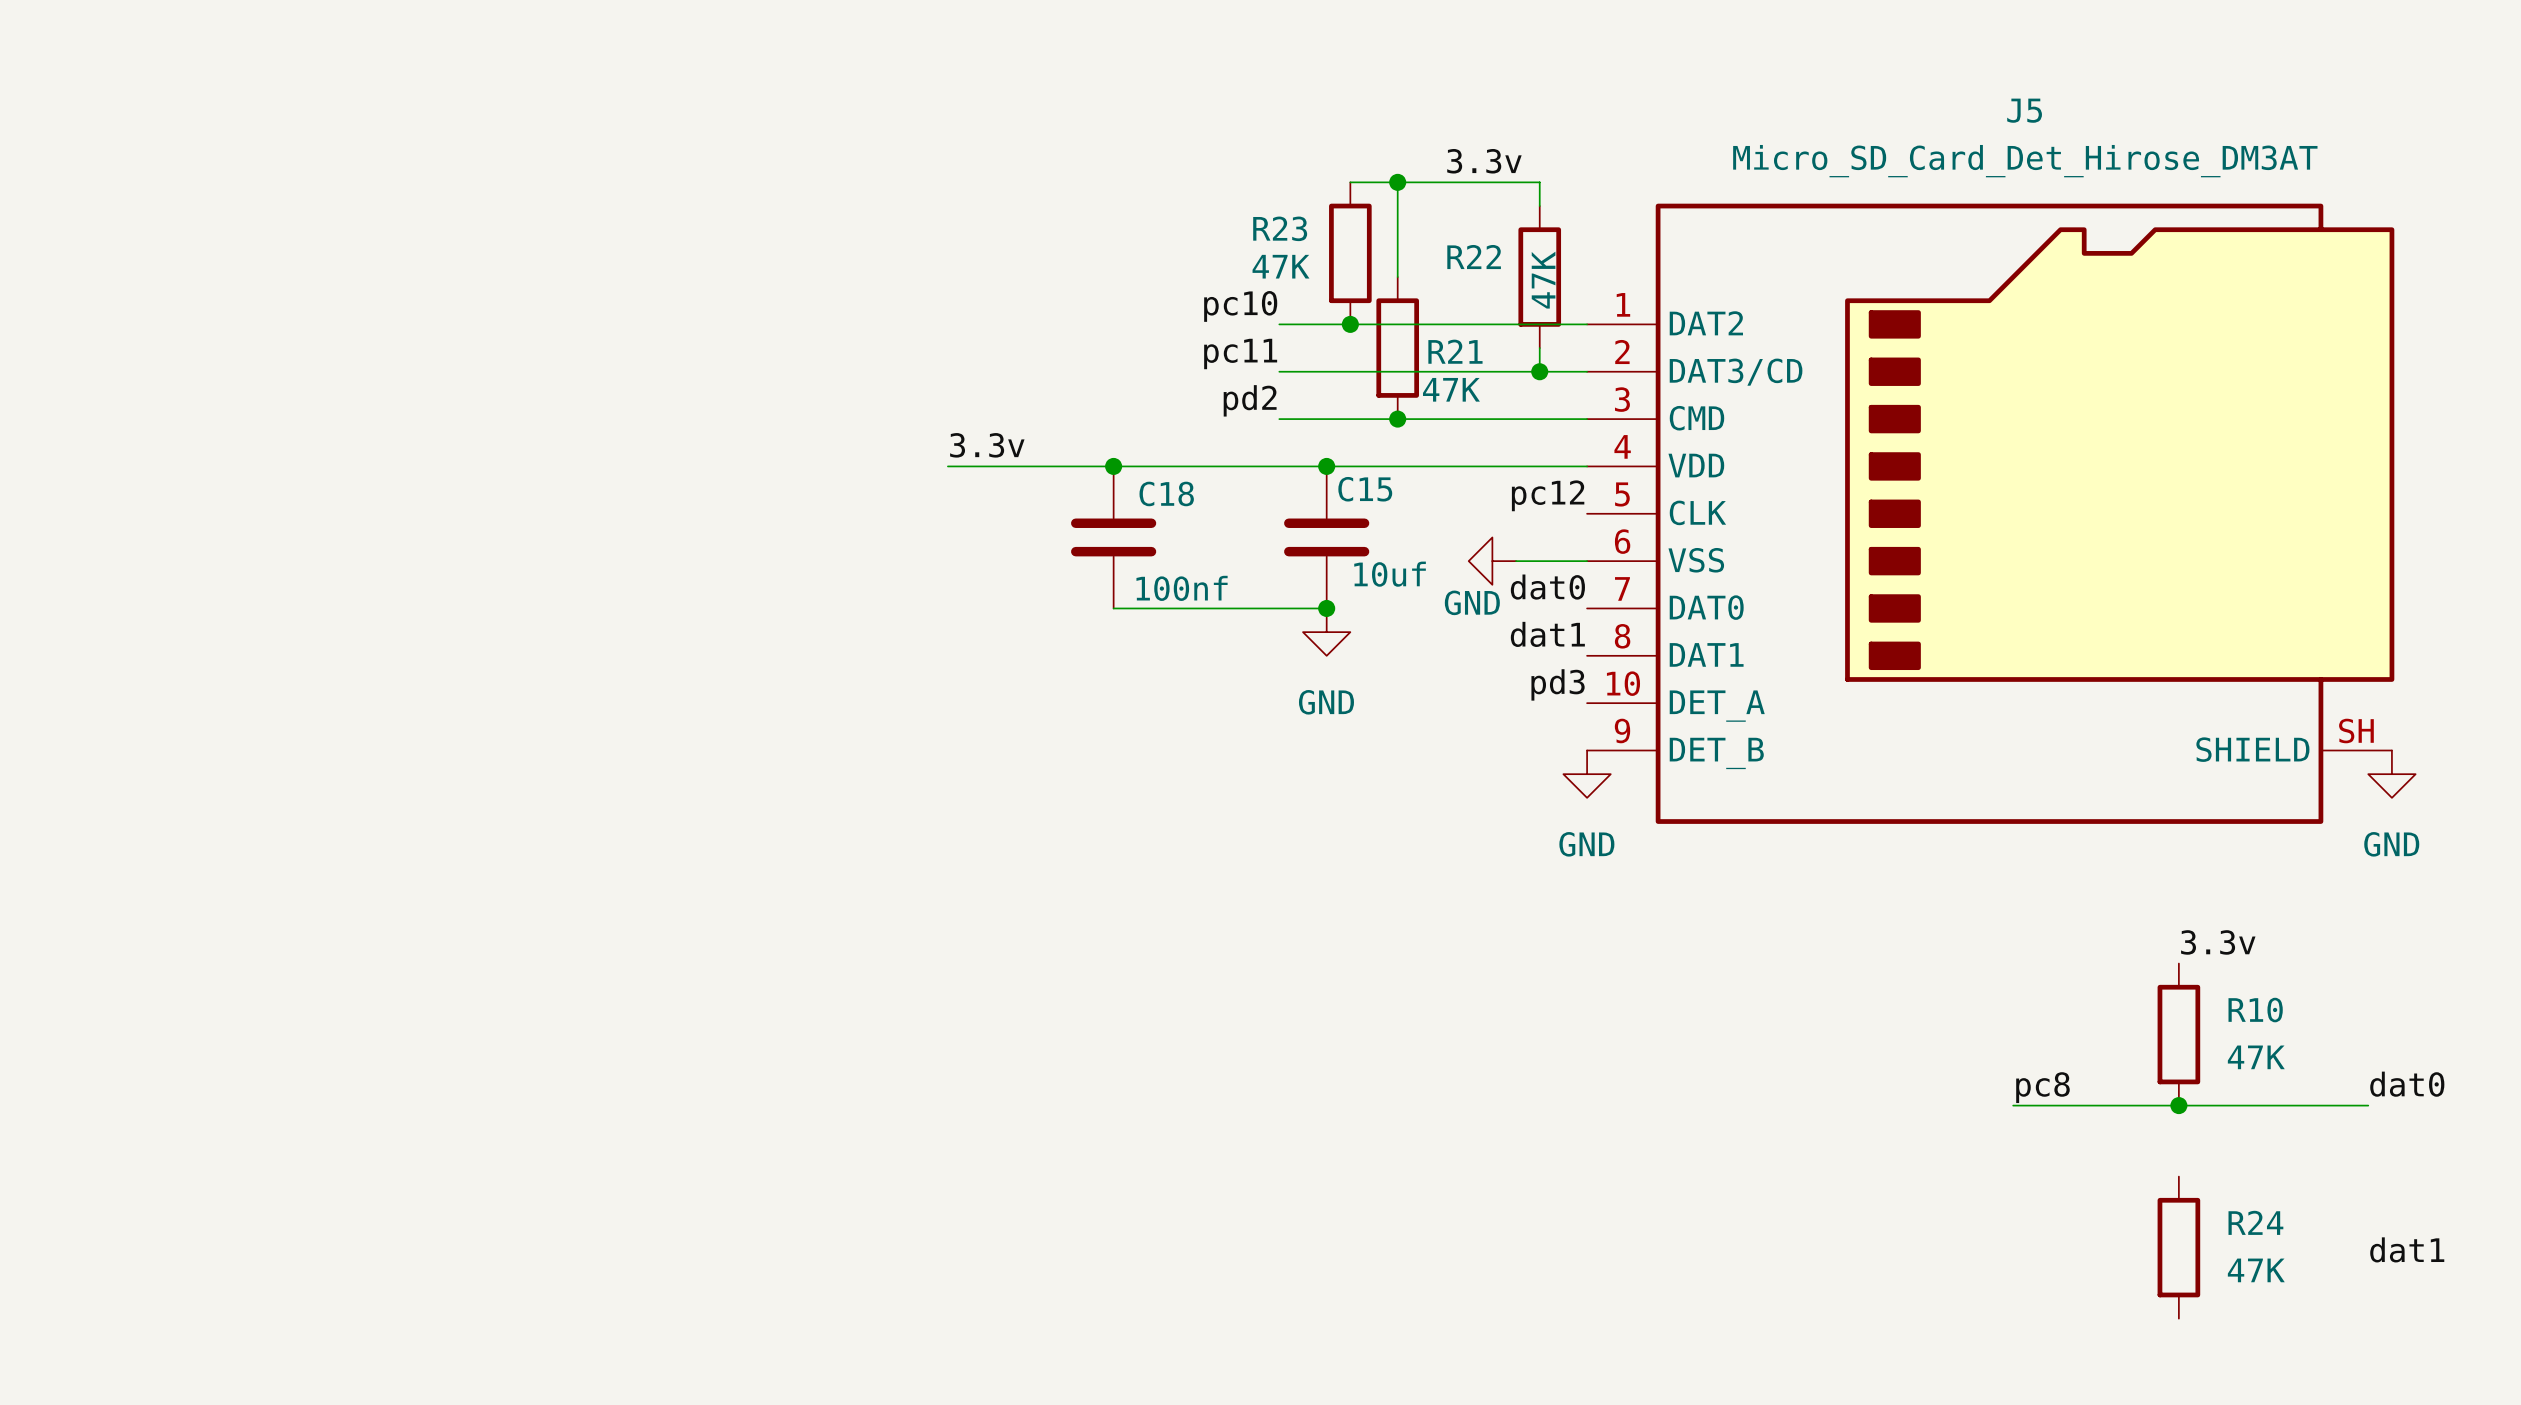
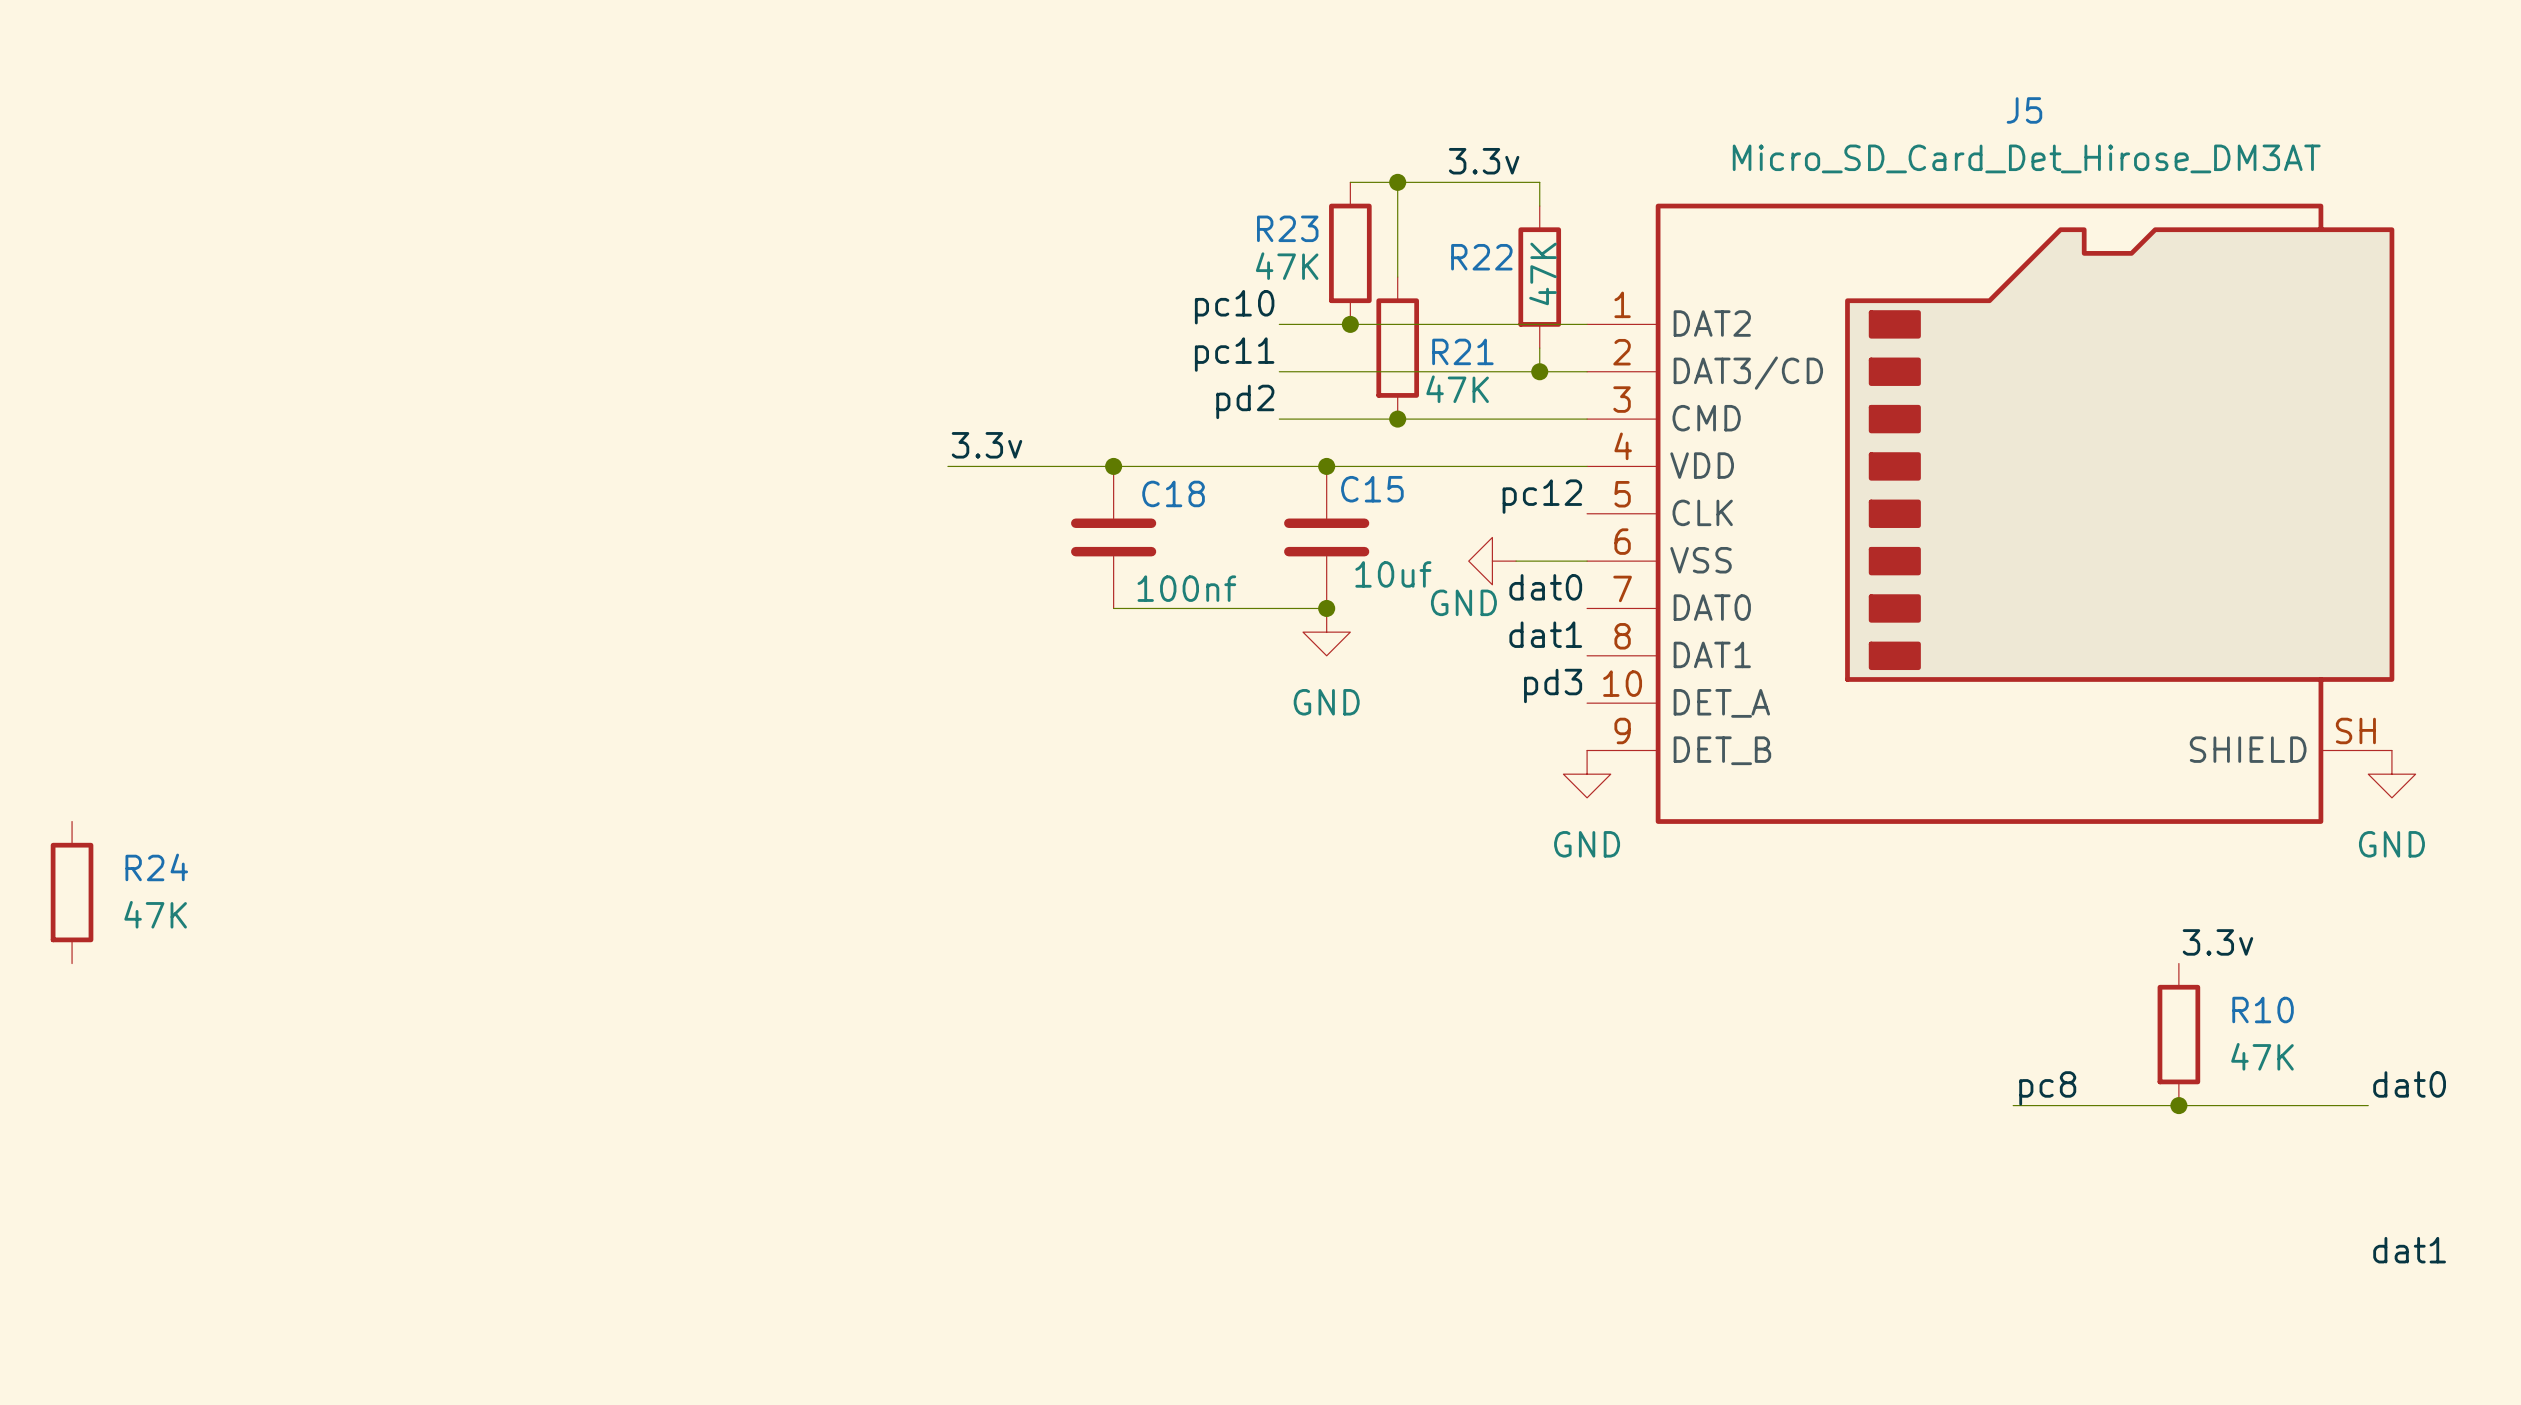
R24 position: (2178, 1247) -> (72, 892)

